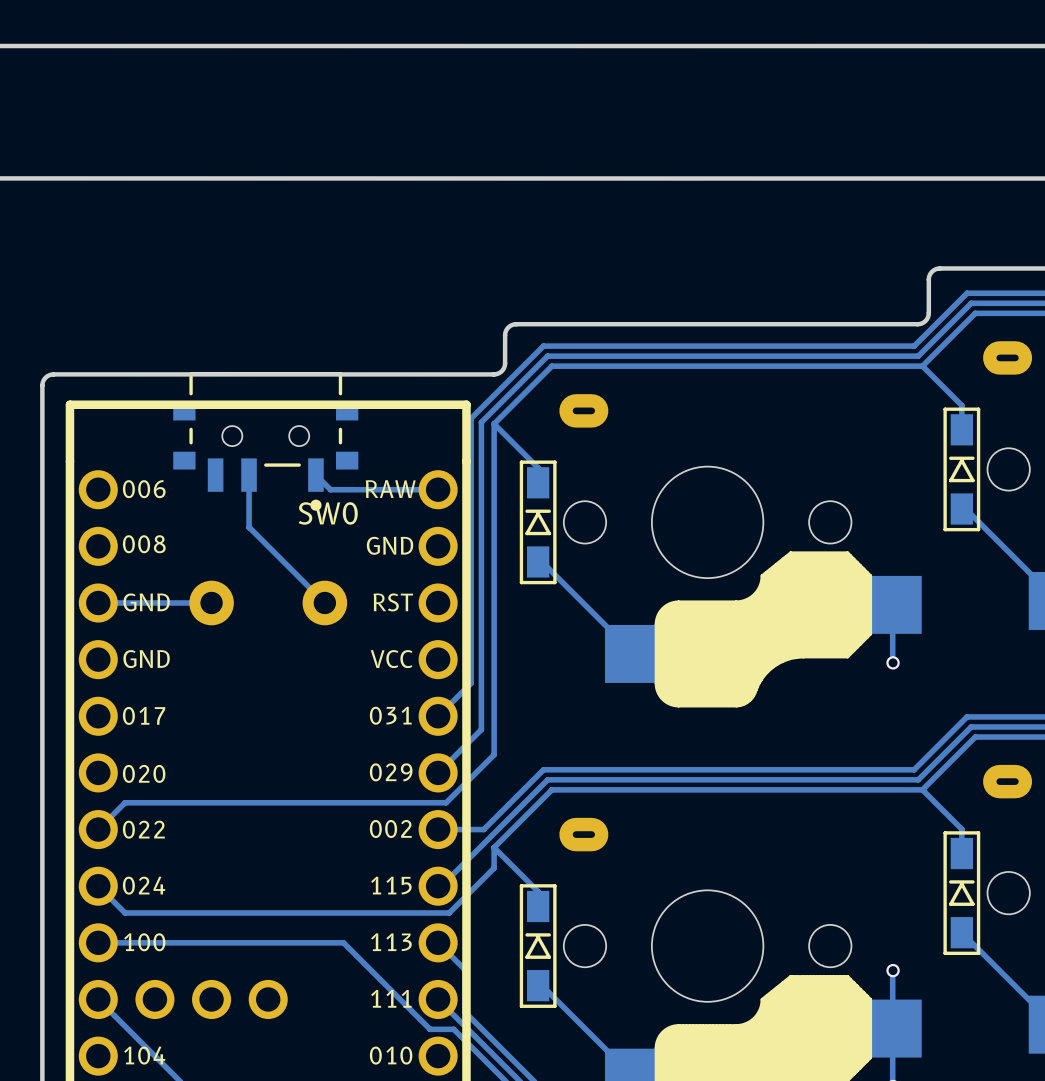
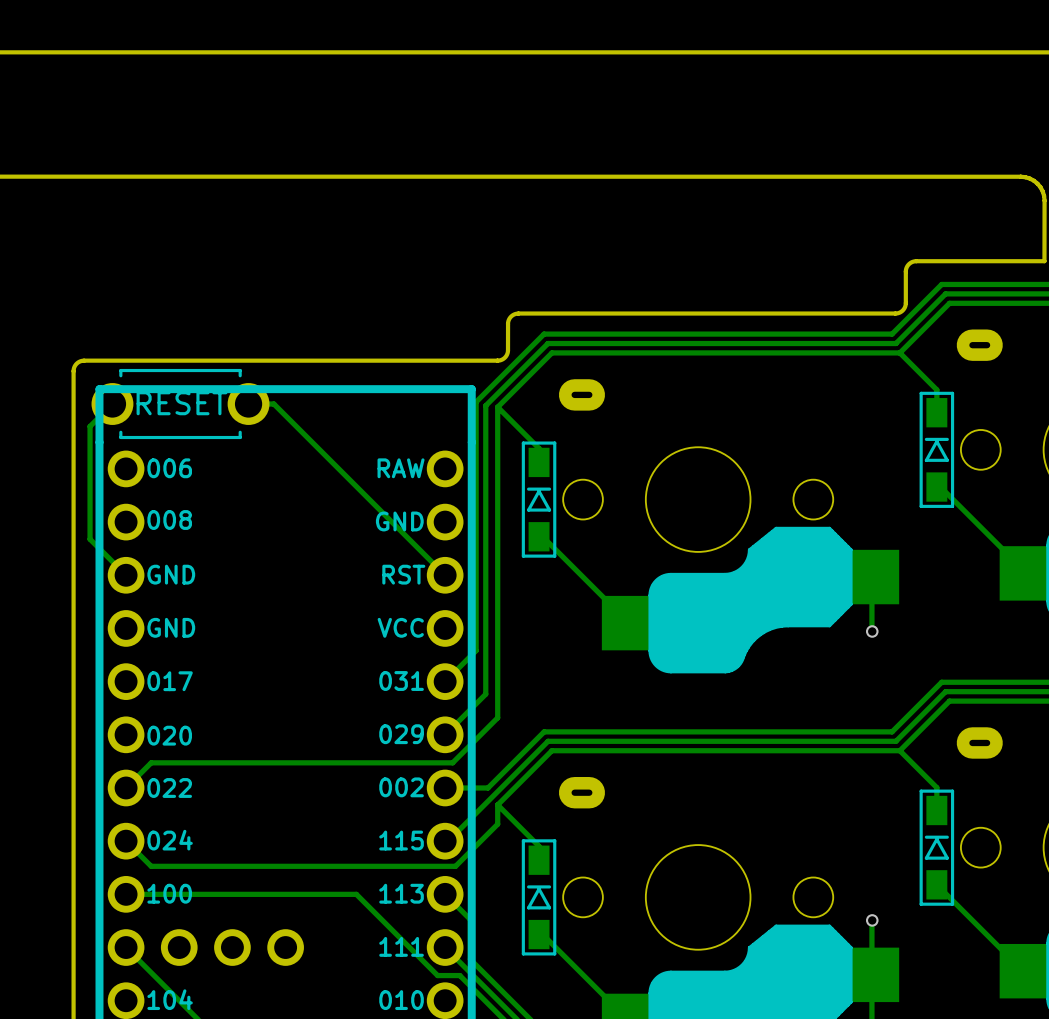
part: none -> (180, 404)
track: none -> (248, 404) (273, 404) (445, 575)
SW0: (265, 441) -> none
track: (249, 475) (249, 527) -> none
track: (315, 475) (330, 489) (438, 489) -> none
track: (249, 527) (324, 602) -> none
track: (211, 602) (98, 602) -> (112, 404) (90, 426) (90, 539) (126, 575)
part: (211, 602) -> none
part: (324, 602) -> none

